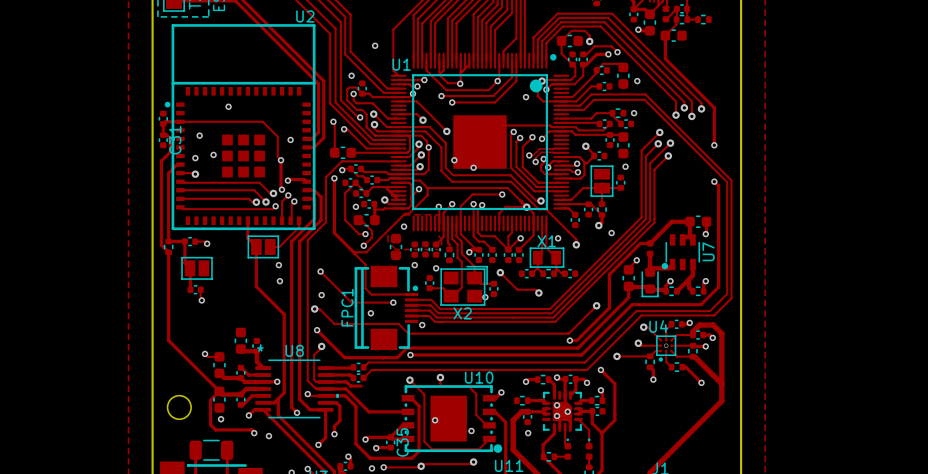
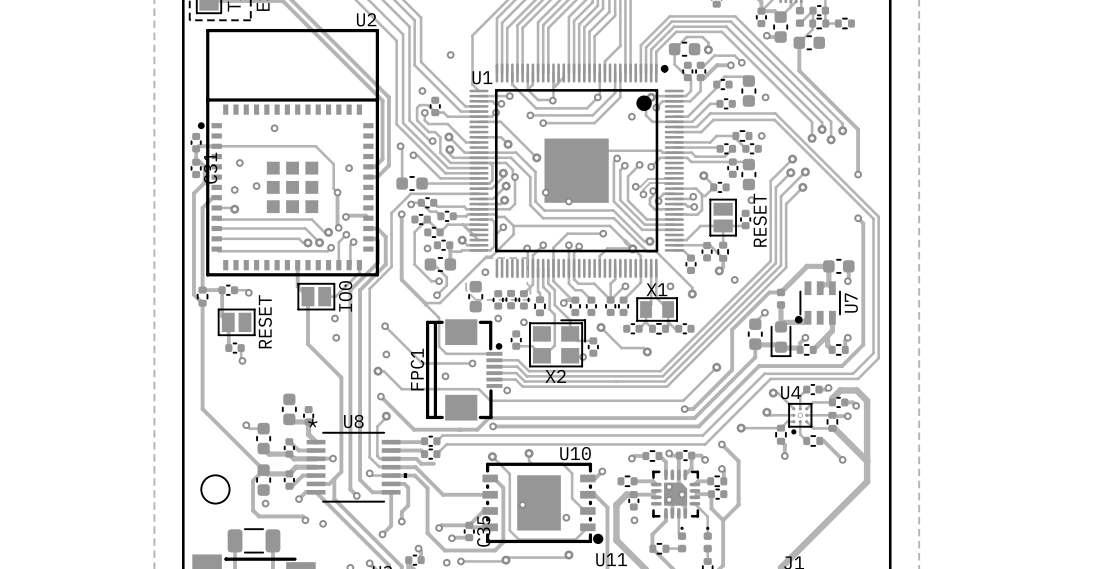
text: none -> RESET (760, 220)
text: none -> IO0 (345, 296)
text: none -> RESET (265, 321)

